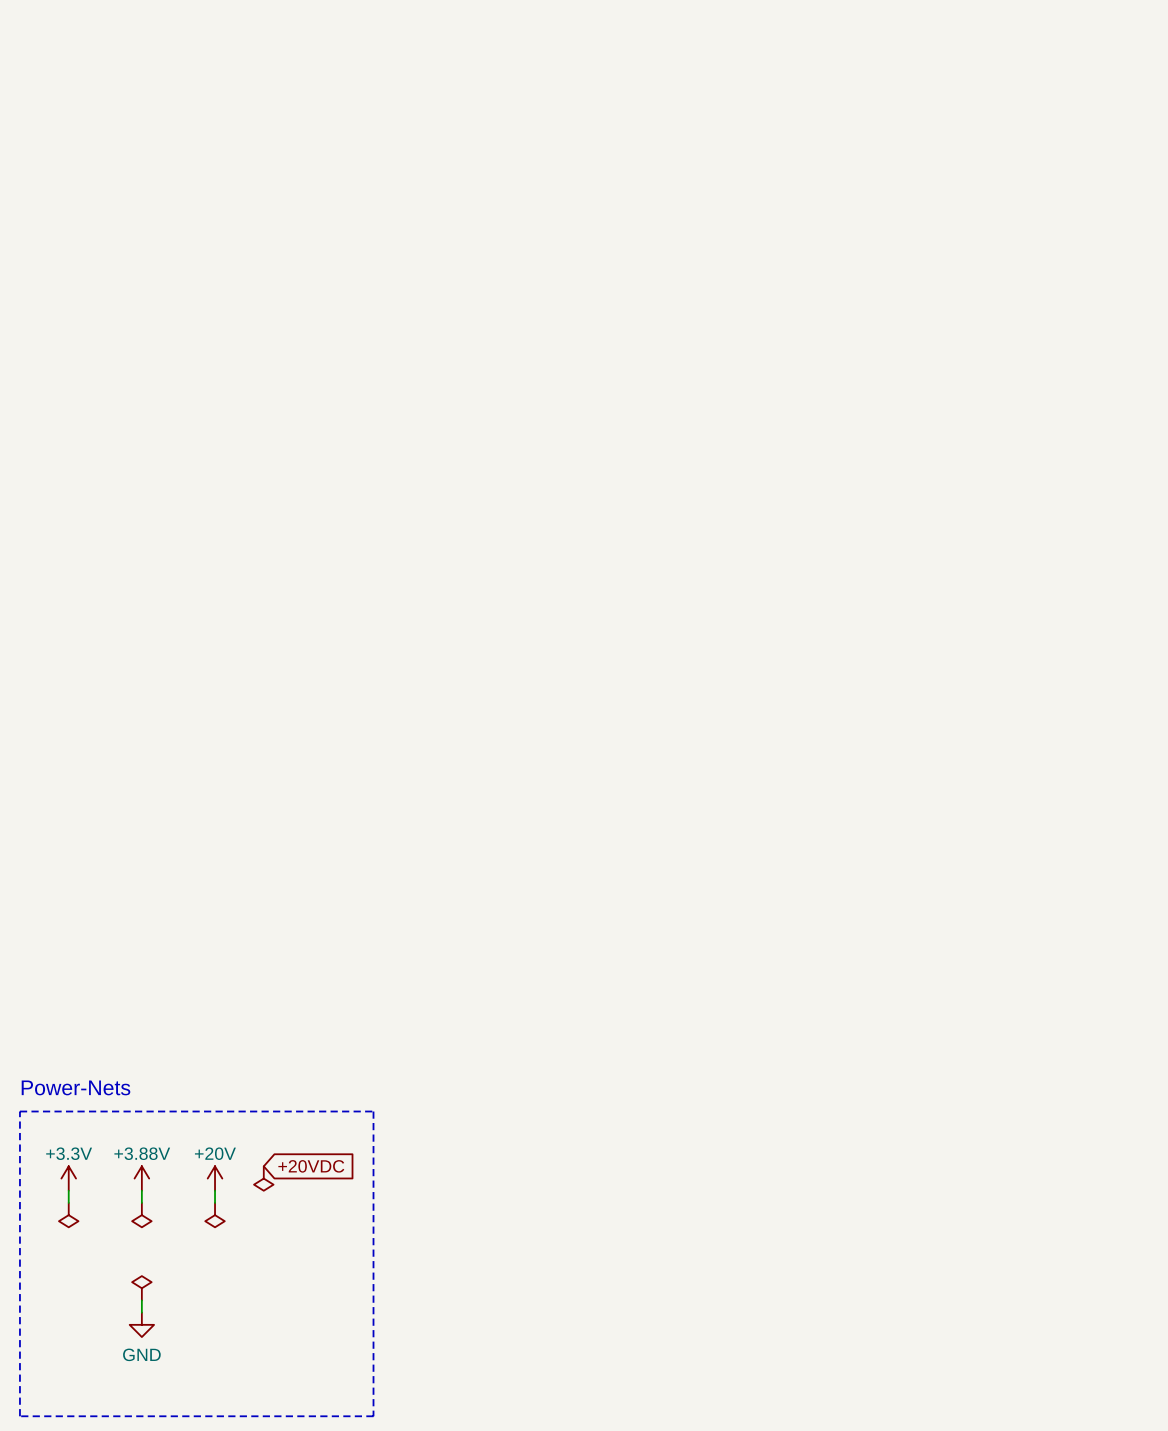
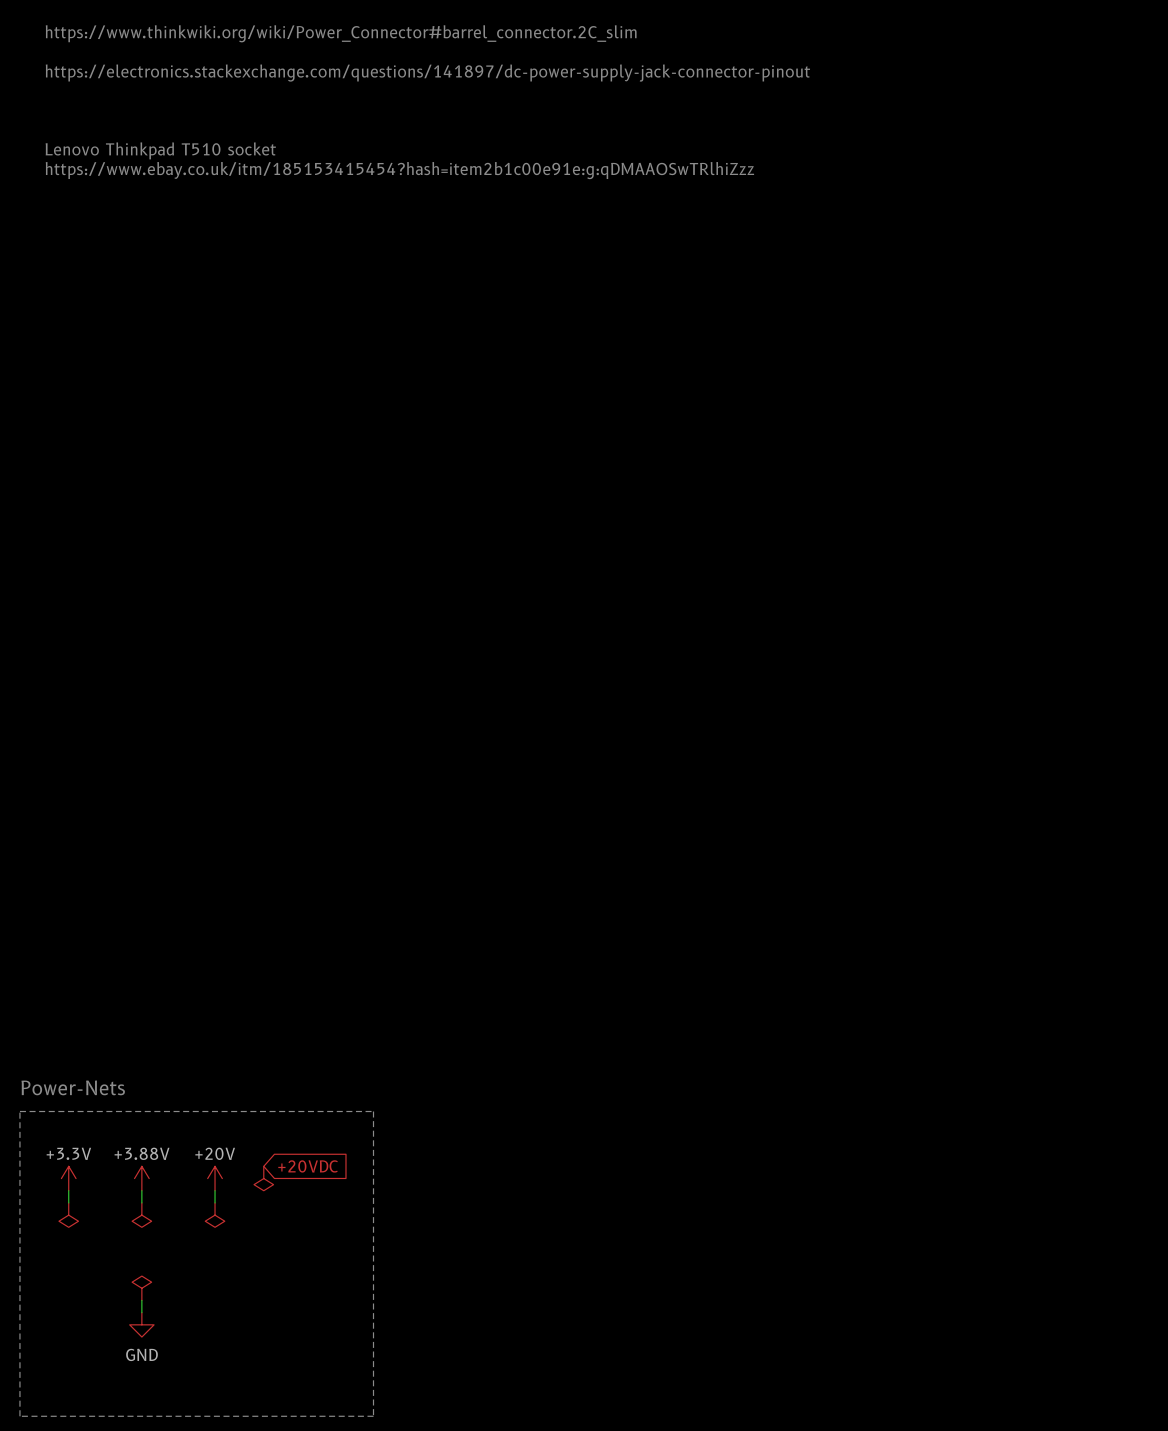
text: none -> https://www.thinkwiki.org/wiki/Power_Connector#barrel_connector.2C_slim (341, 33)
text: none -> https://electronics.stackexchange.com/questions/141897/dc-power-supply-jack-connector-pinout (427, 73)
text: none -> Lenovo Thinkpad T510 socket (160, 150)
text: none -> https://www.ebay.co.uk/itm/185153415454?hash=item2b1c00e91e:g:qDMAAOSwTRlhiZzz (399, 170)

